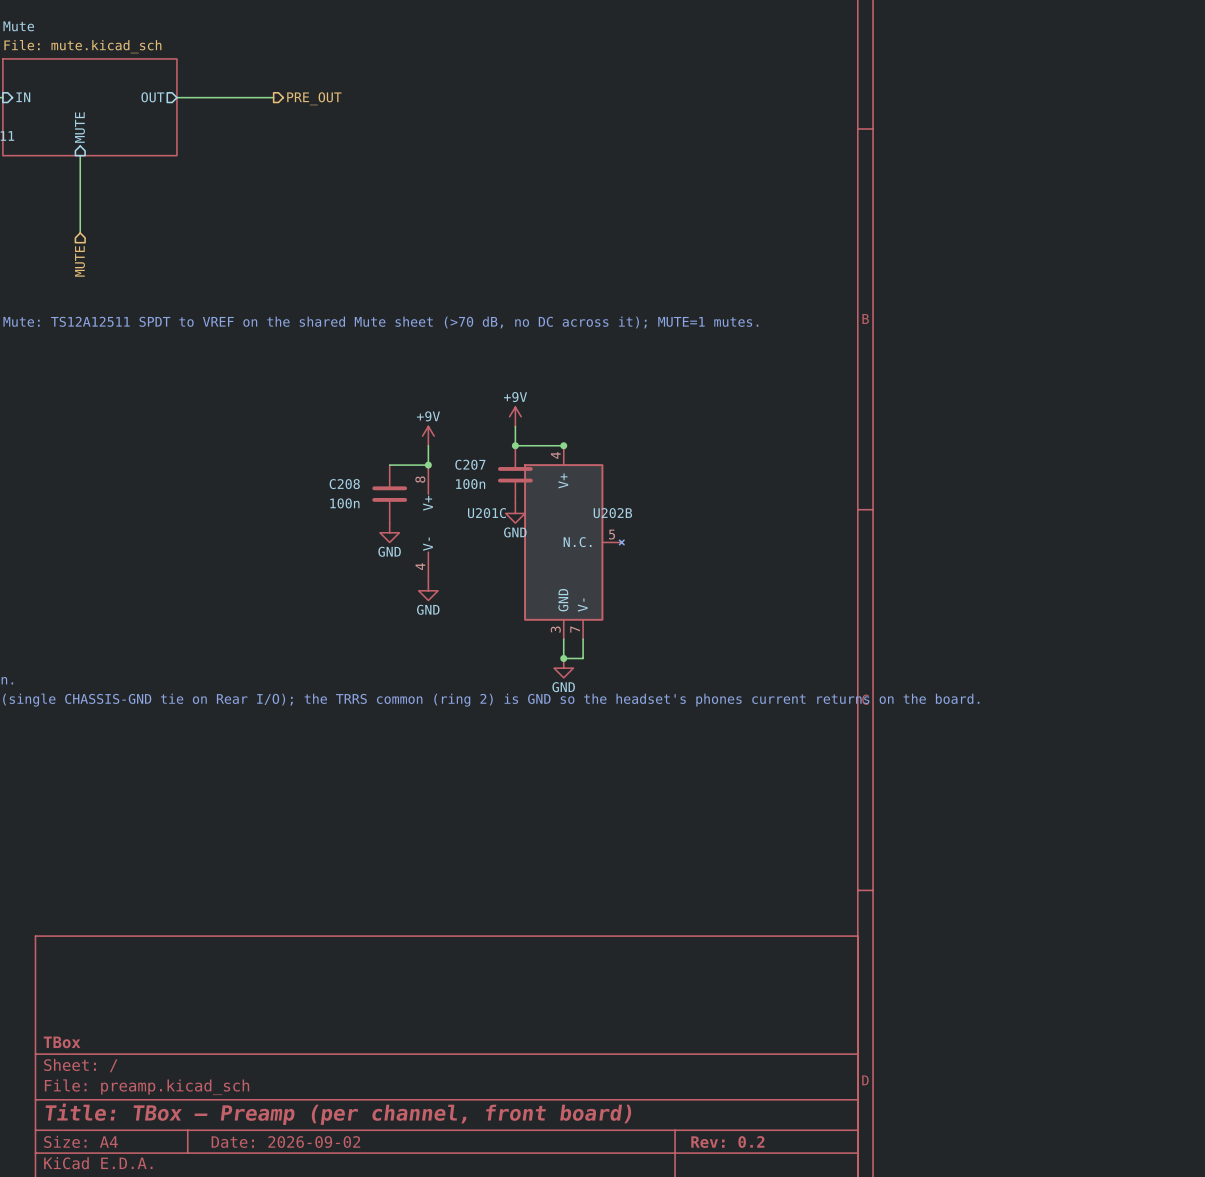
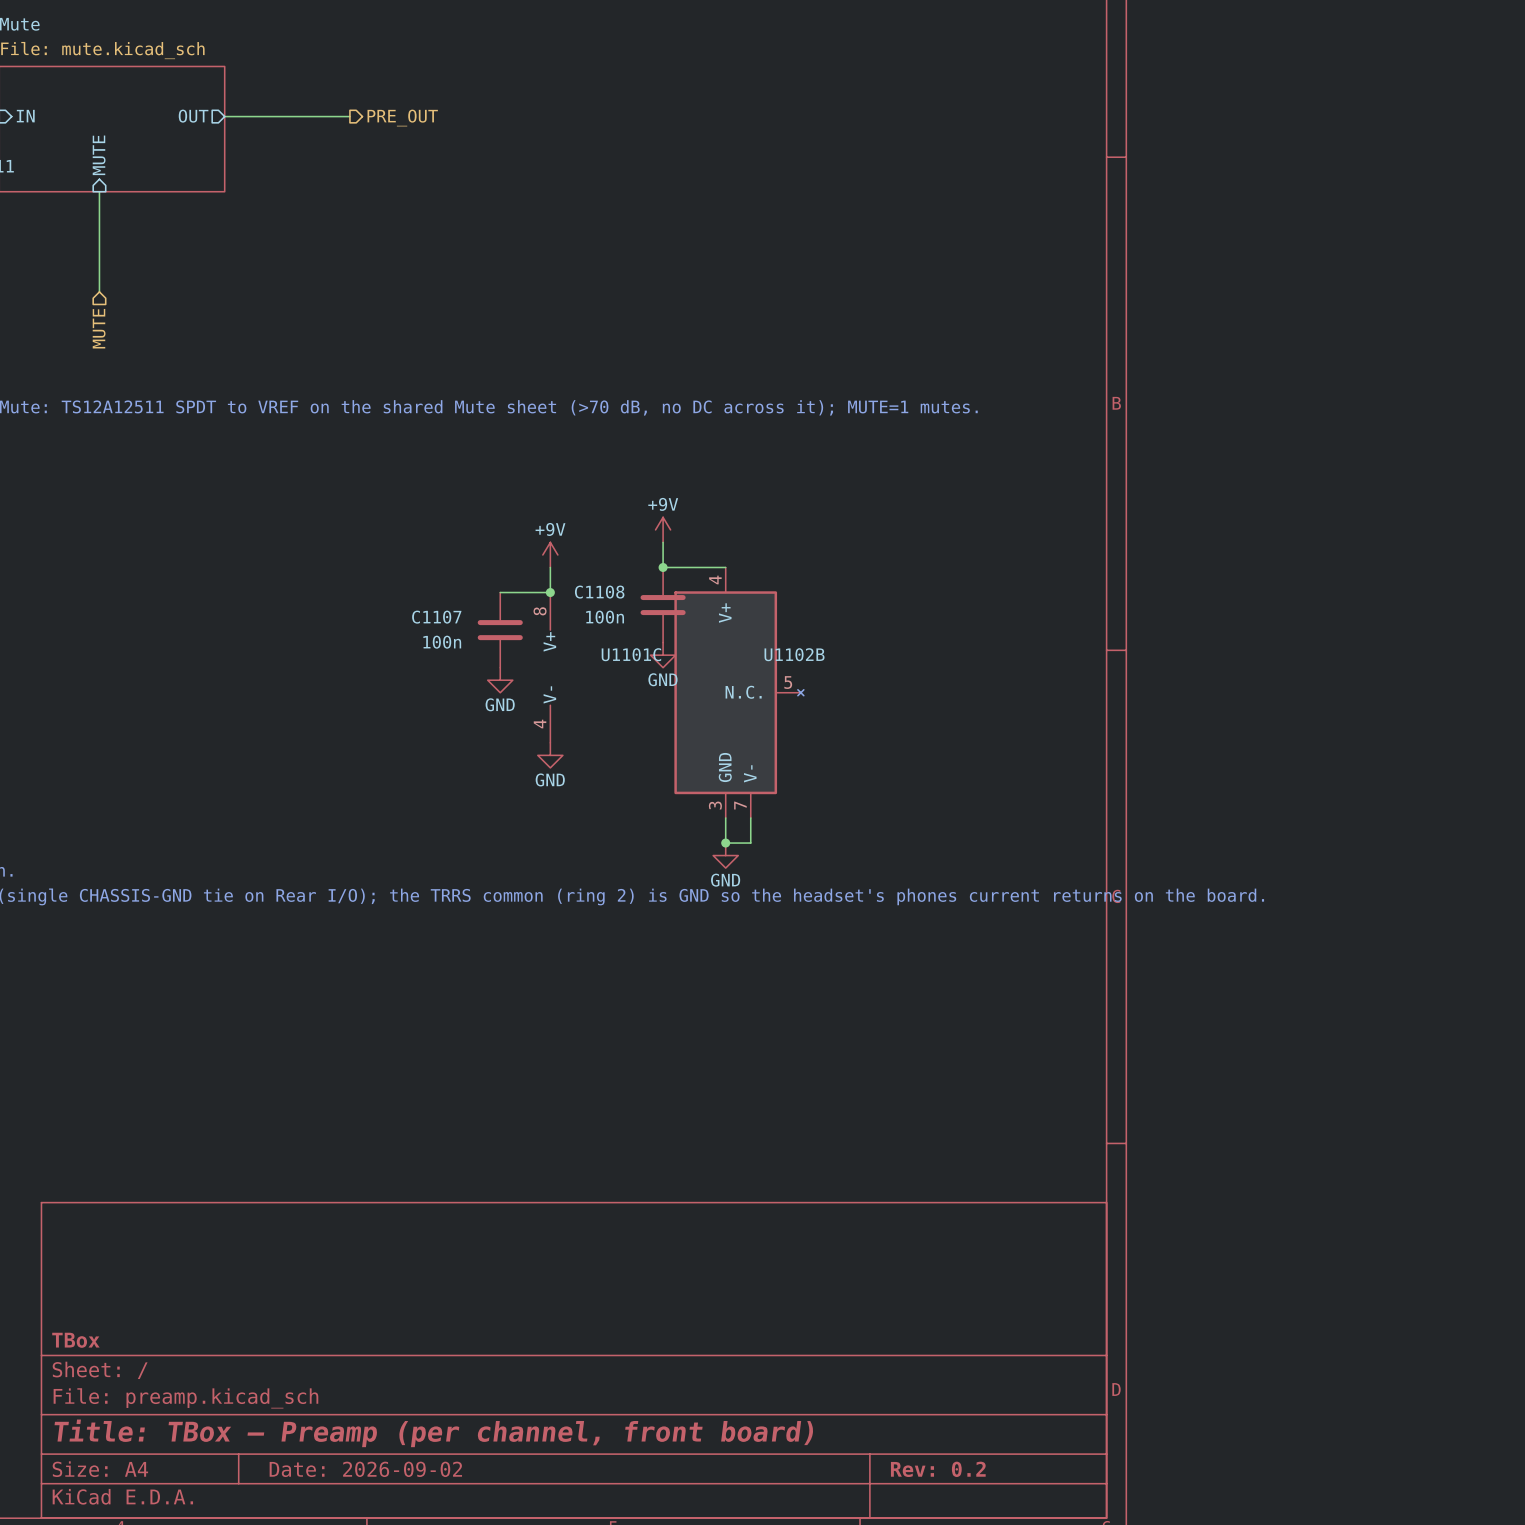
junction: (563, 445) -> none
C207 name: C207 (470, 464) -> C1108 (599, 592)
C208 name: C208 (344, 484) -> C1107 (436, 617)
U201C name: U201C (486, 513) -> U1101C (631, 654)
U202B name: U202B (612, 513) -> U1102B (794, 654)

